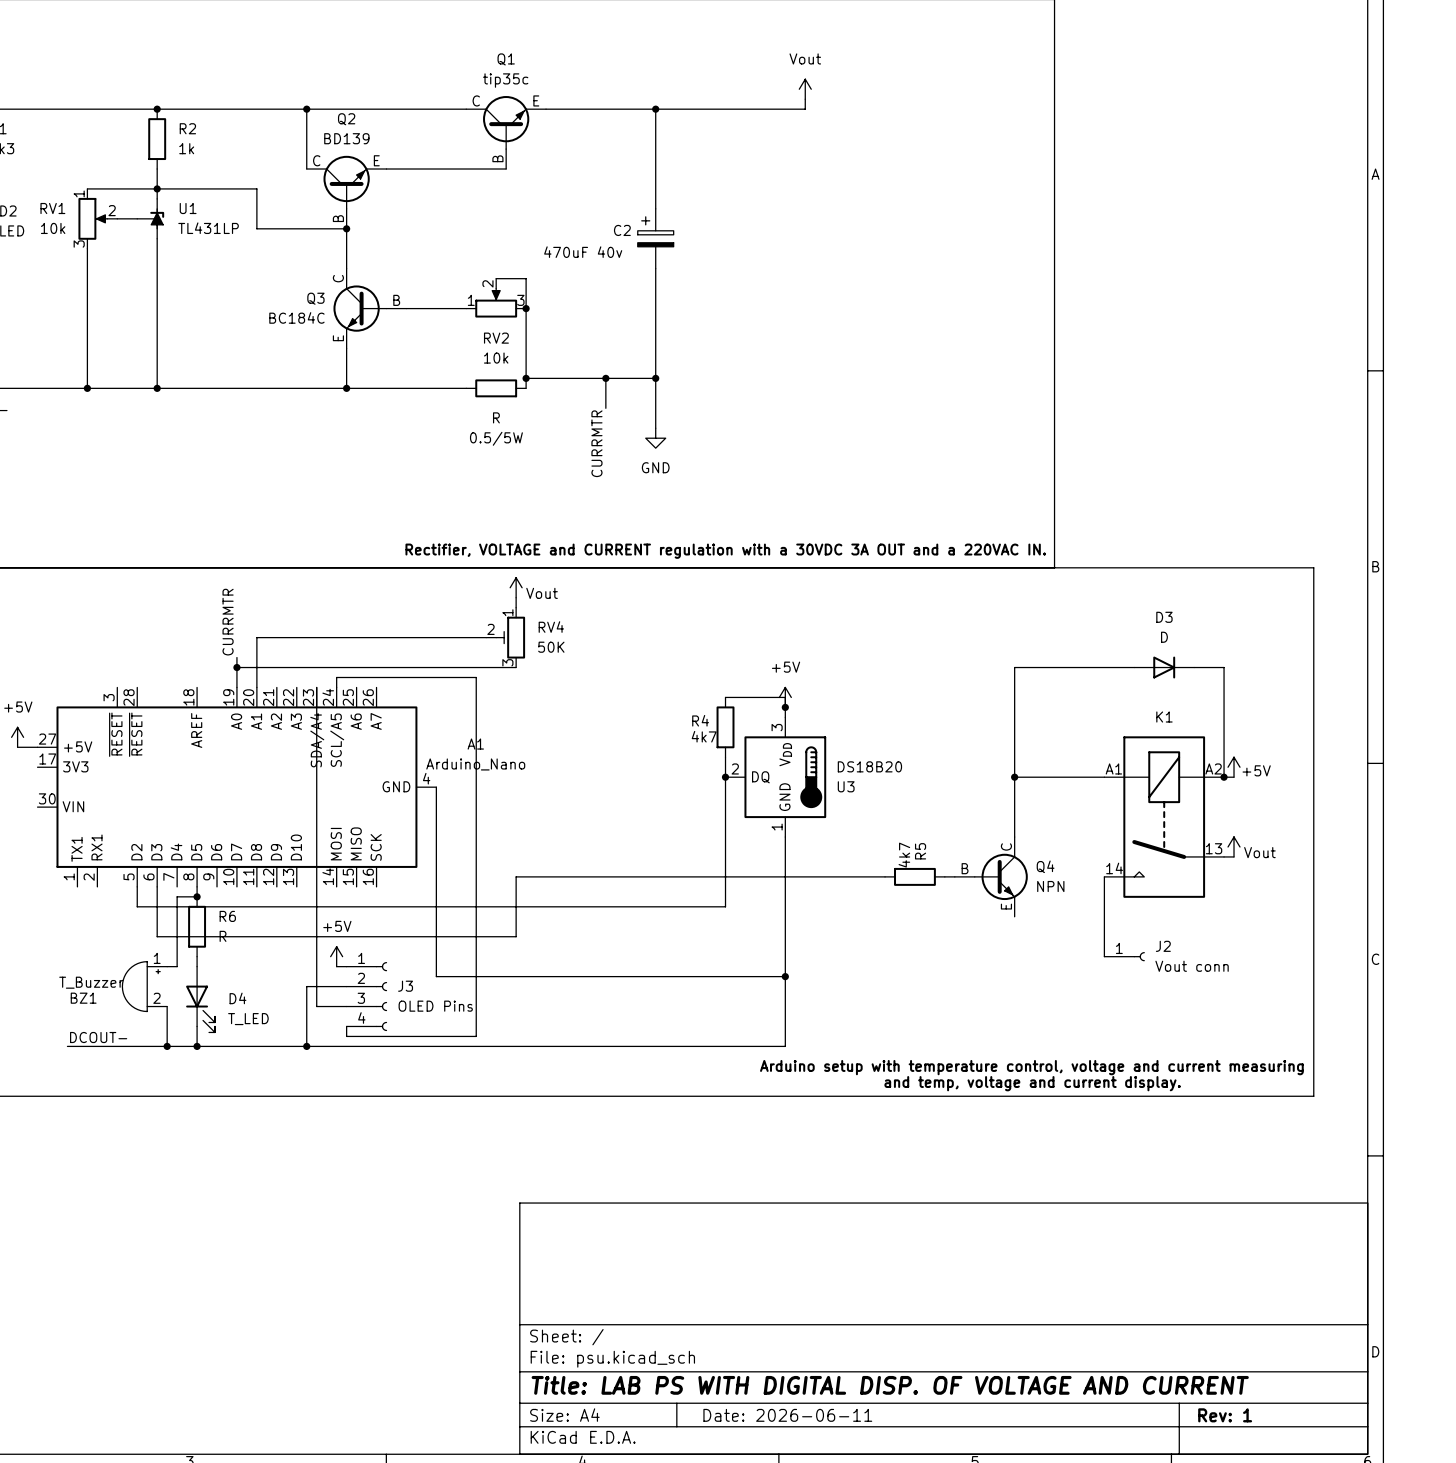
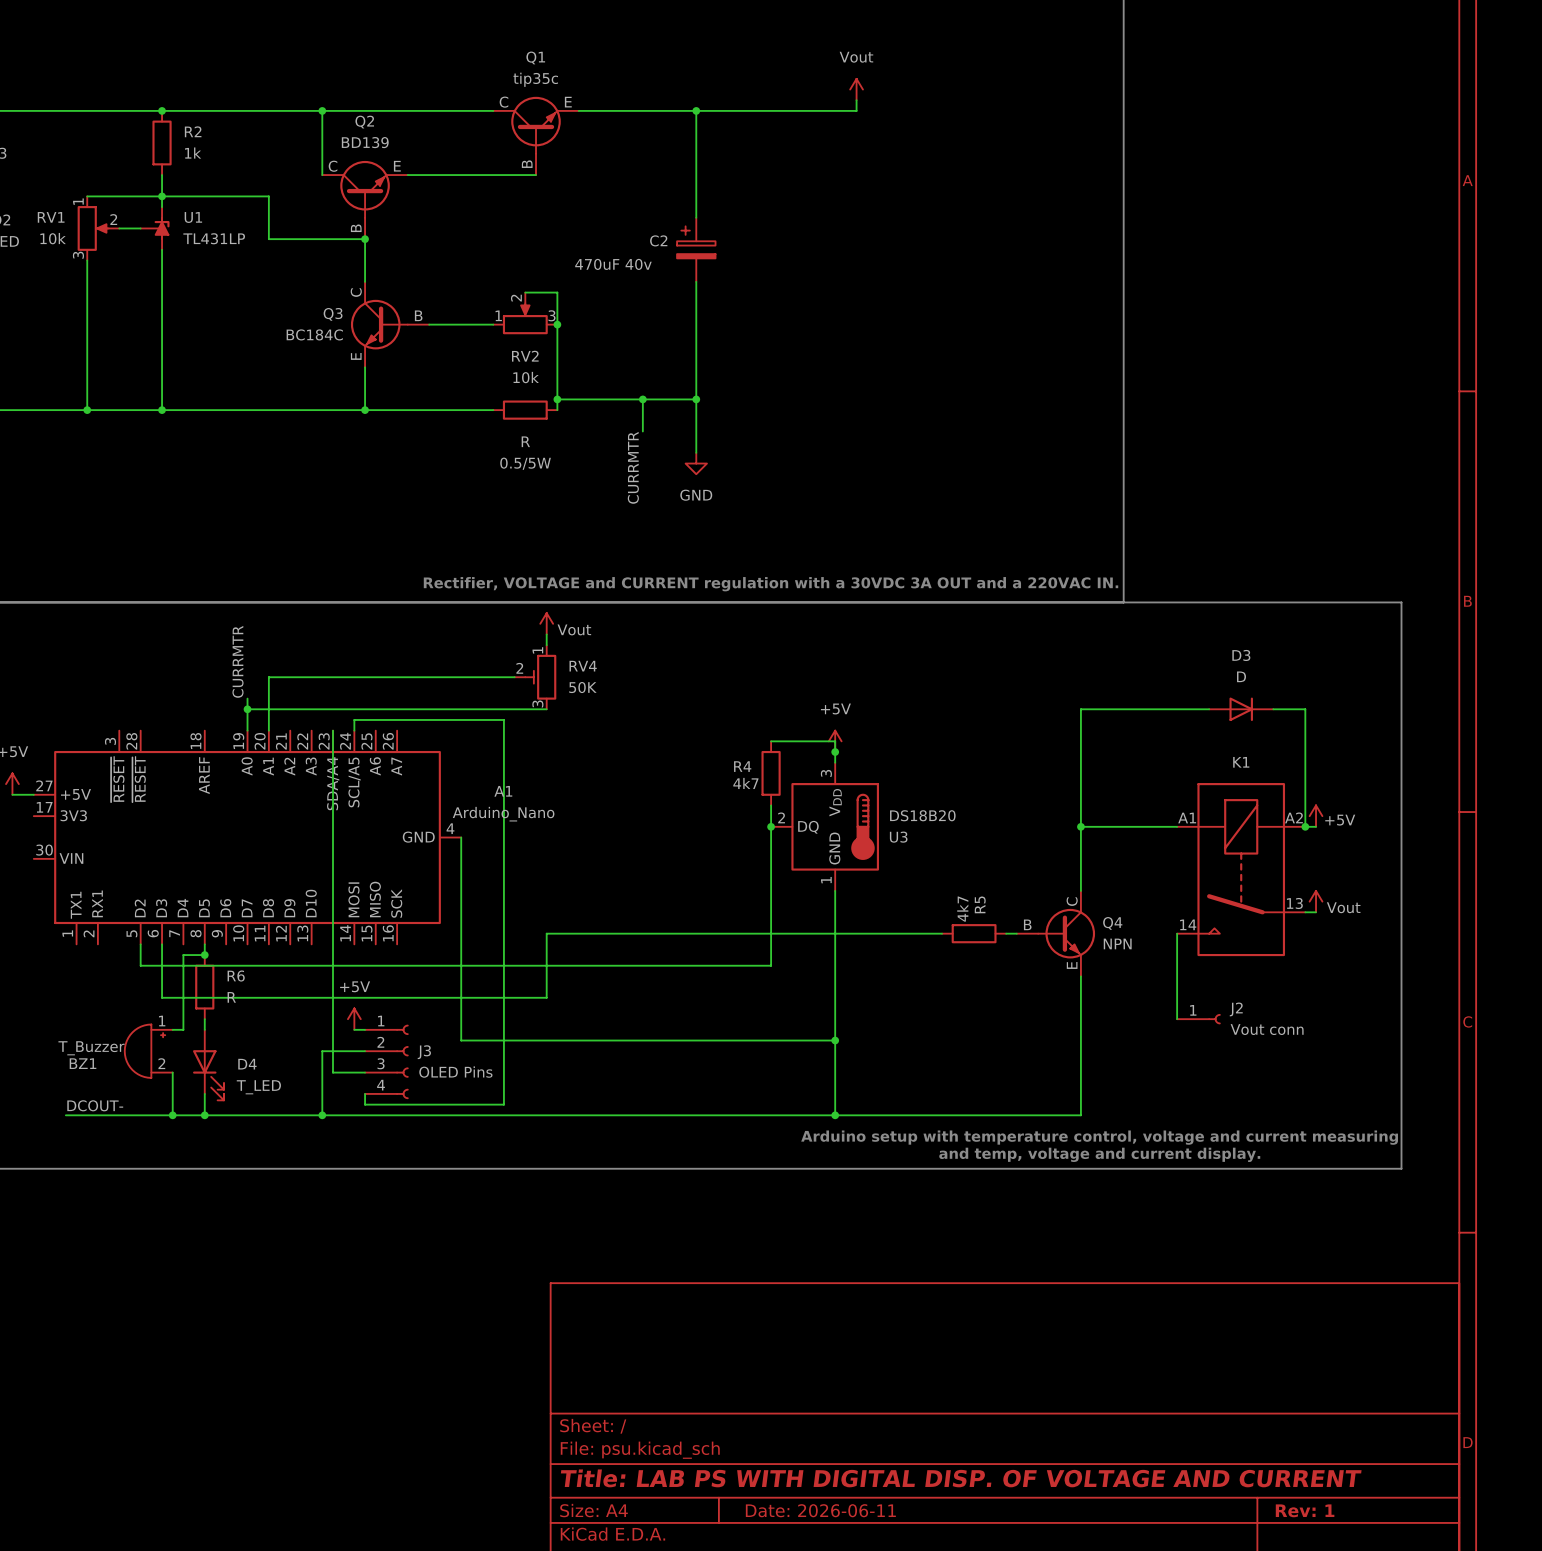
wire: none -> (1080, 976) (1080, 1115) (835, 1115)
junction: none -> (835, 1115)

